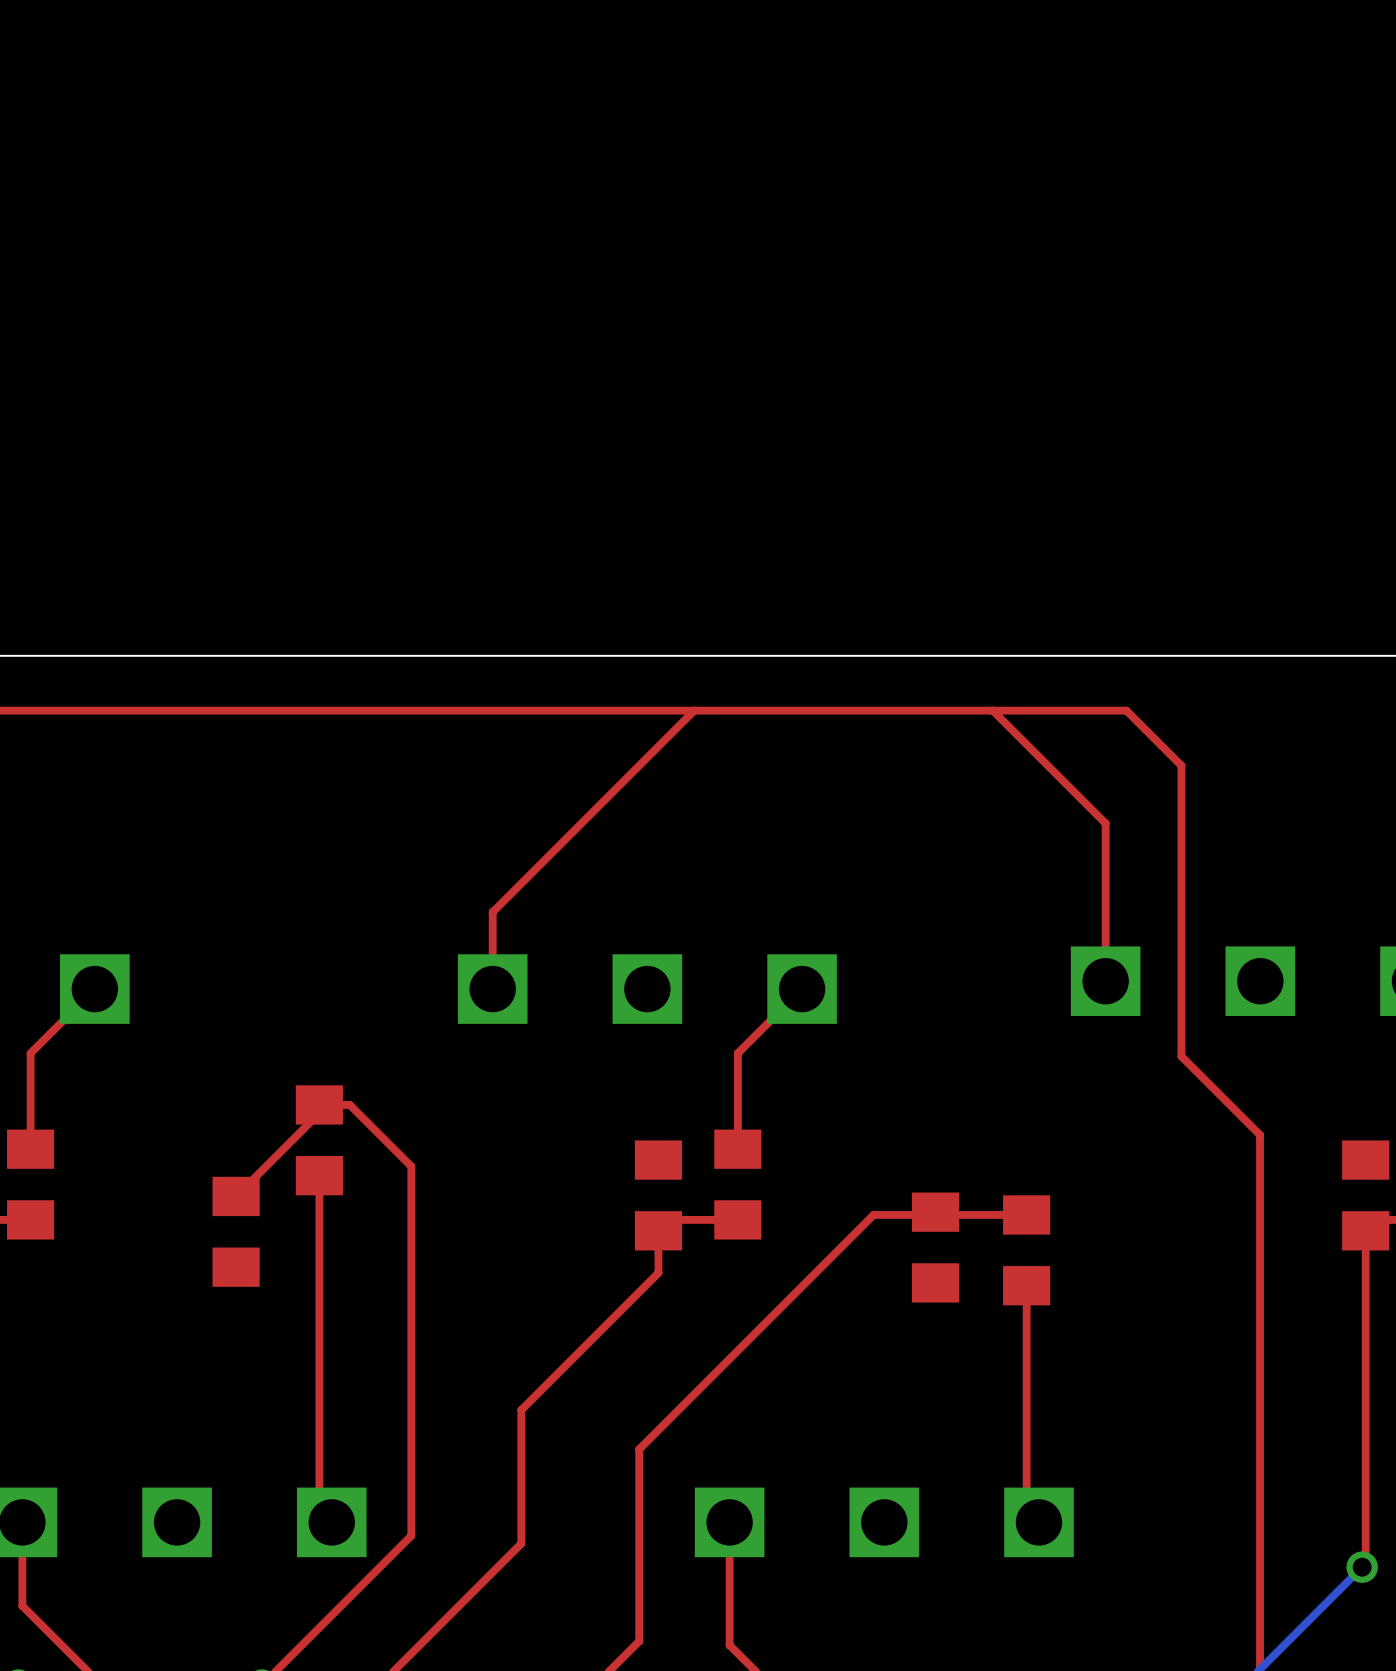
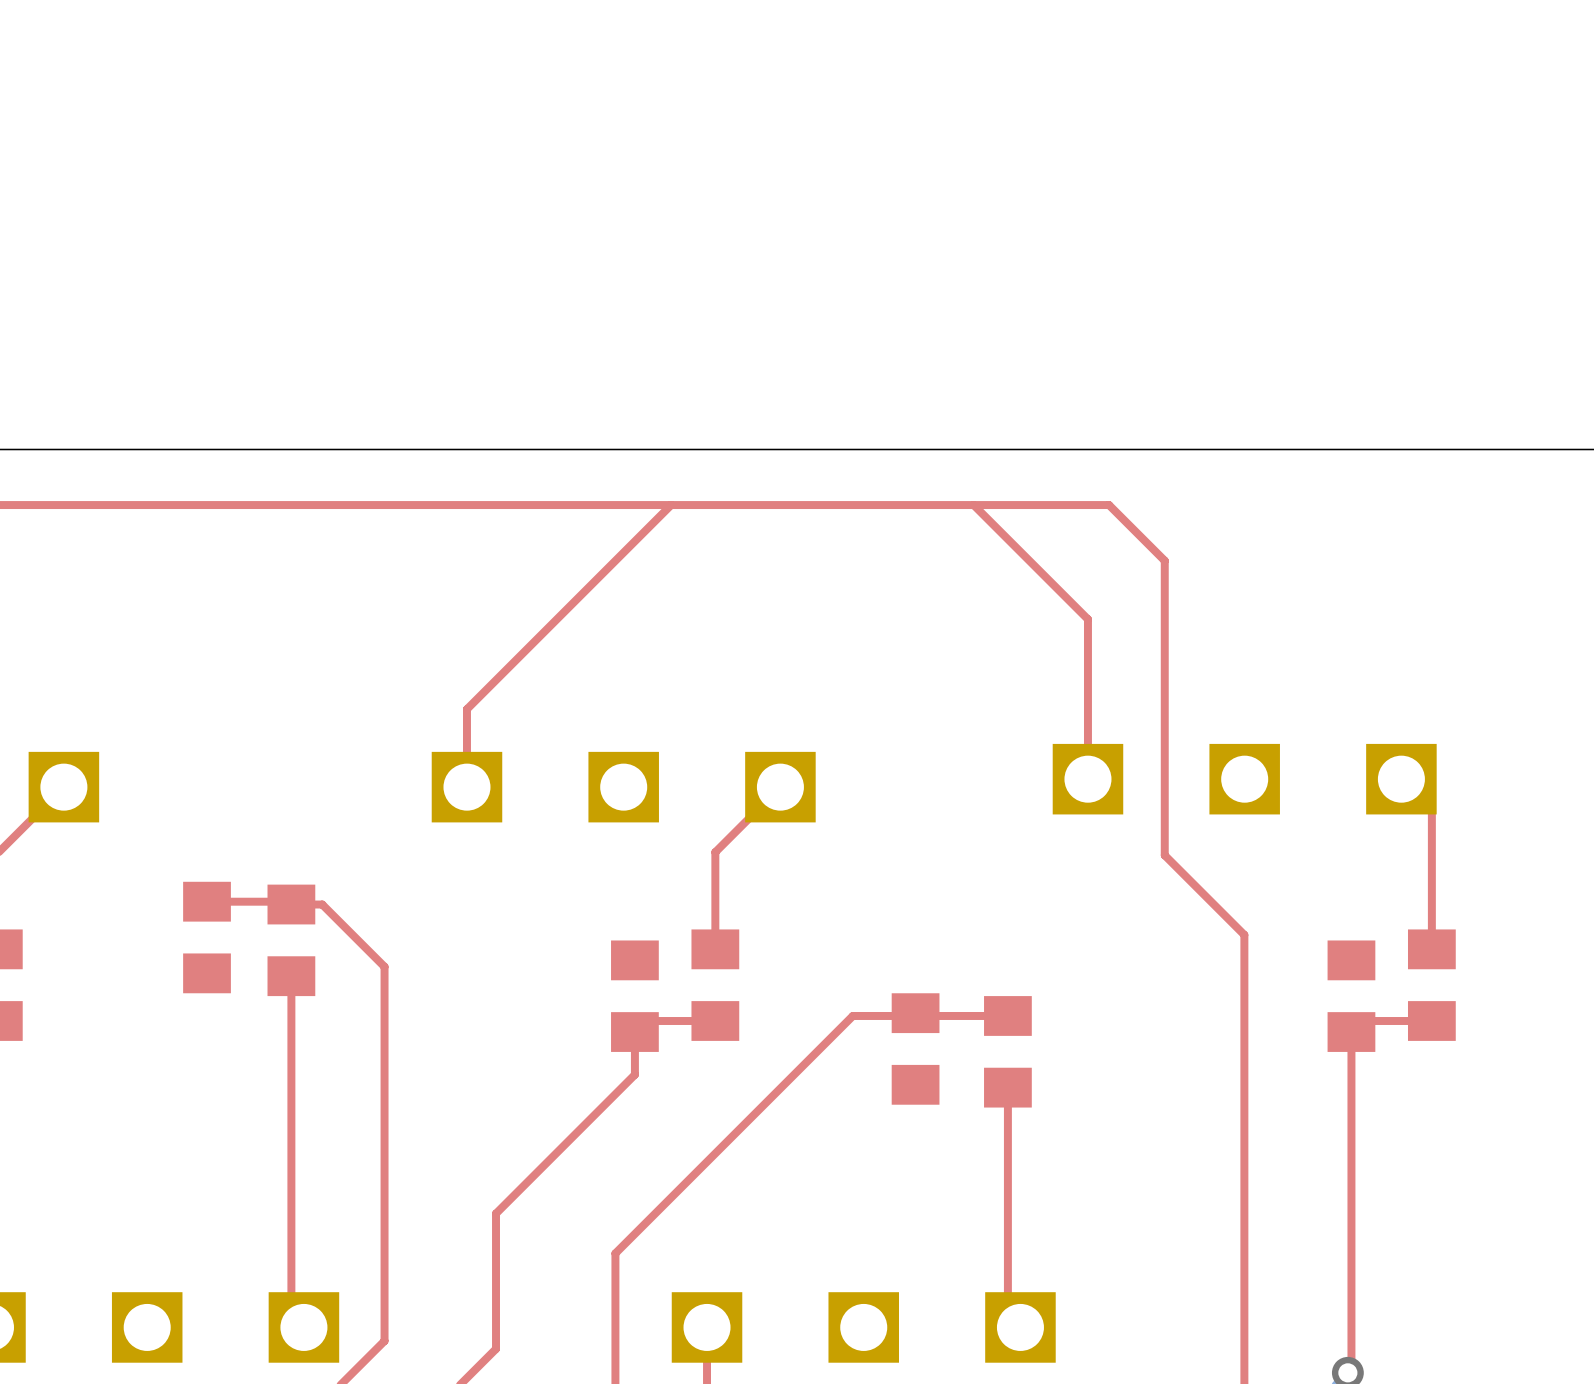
top track: (316, 1102) (316, 1115) (236, 1196) -> (288, 901) (207, 901)
part position: (236, 1231) -> (207, 937)

